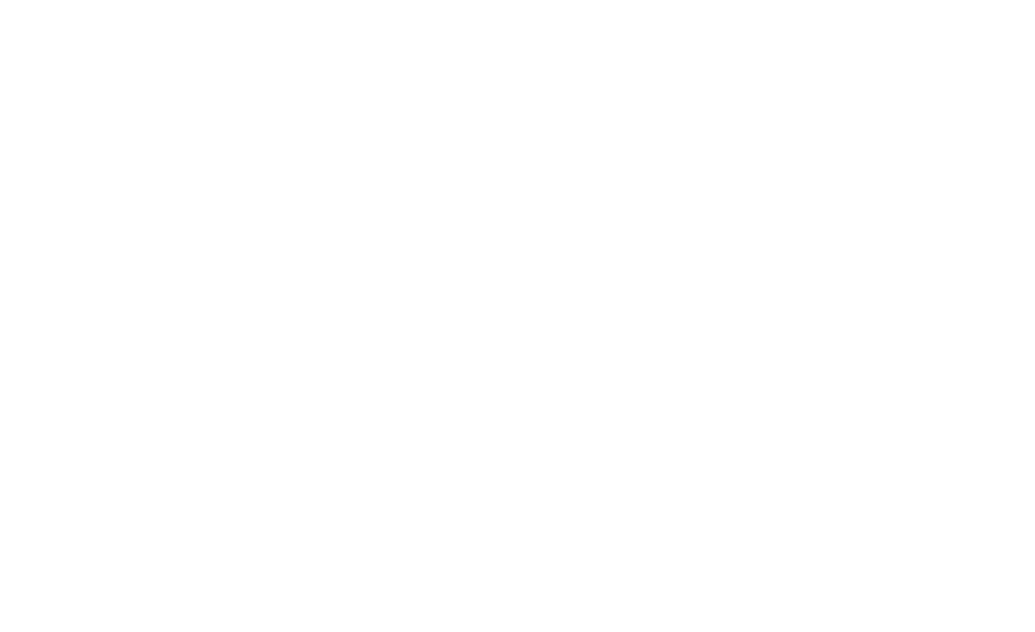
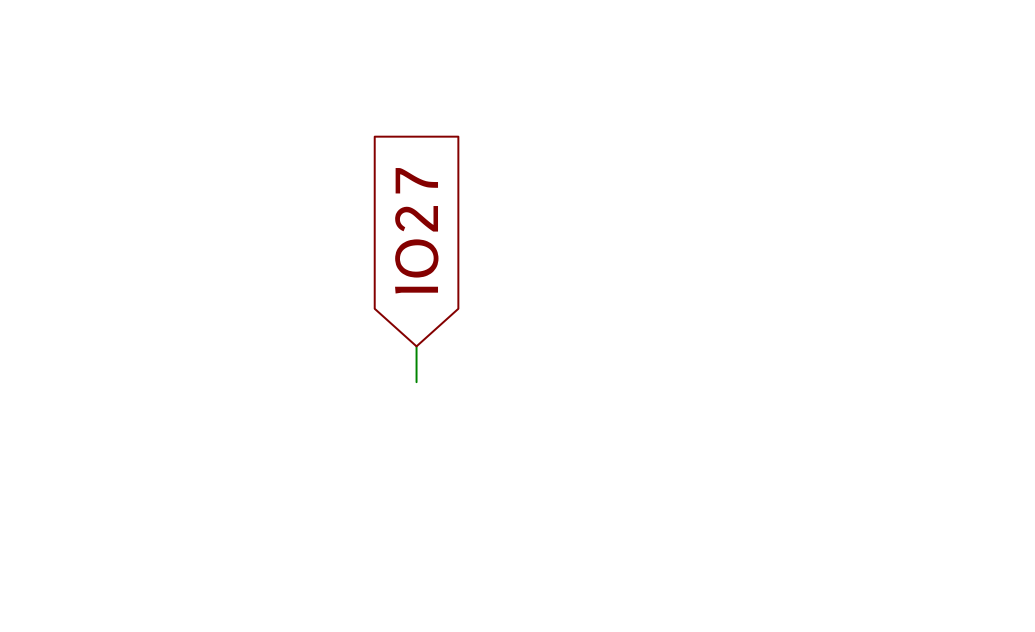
global label: none -> IO27 (416, 230)
wire: none -> (416, 346) (416, 382)

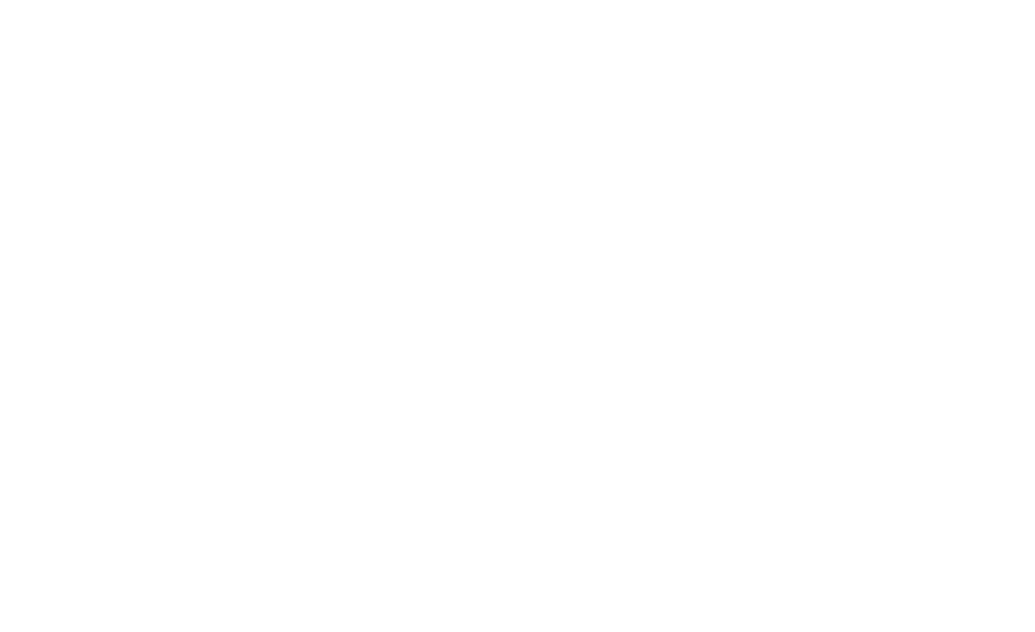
global label: IO27 (416, 230) -> none
wire: (416, 346) (416, 382) -> none

